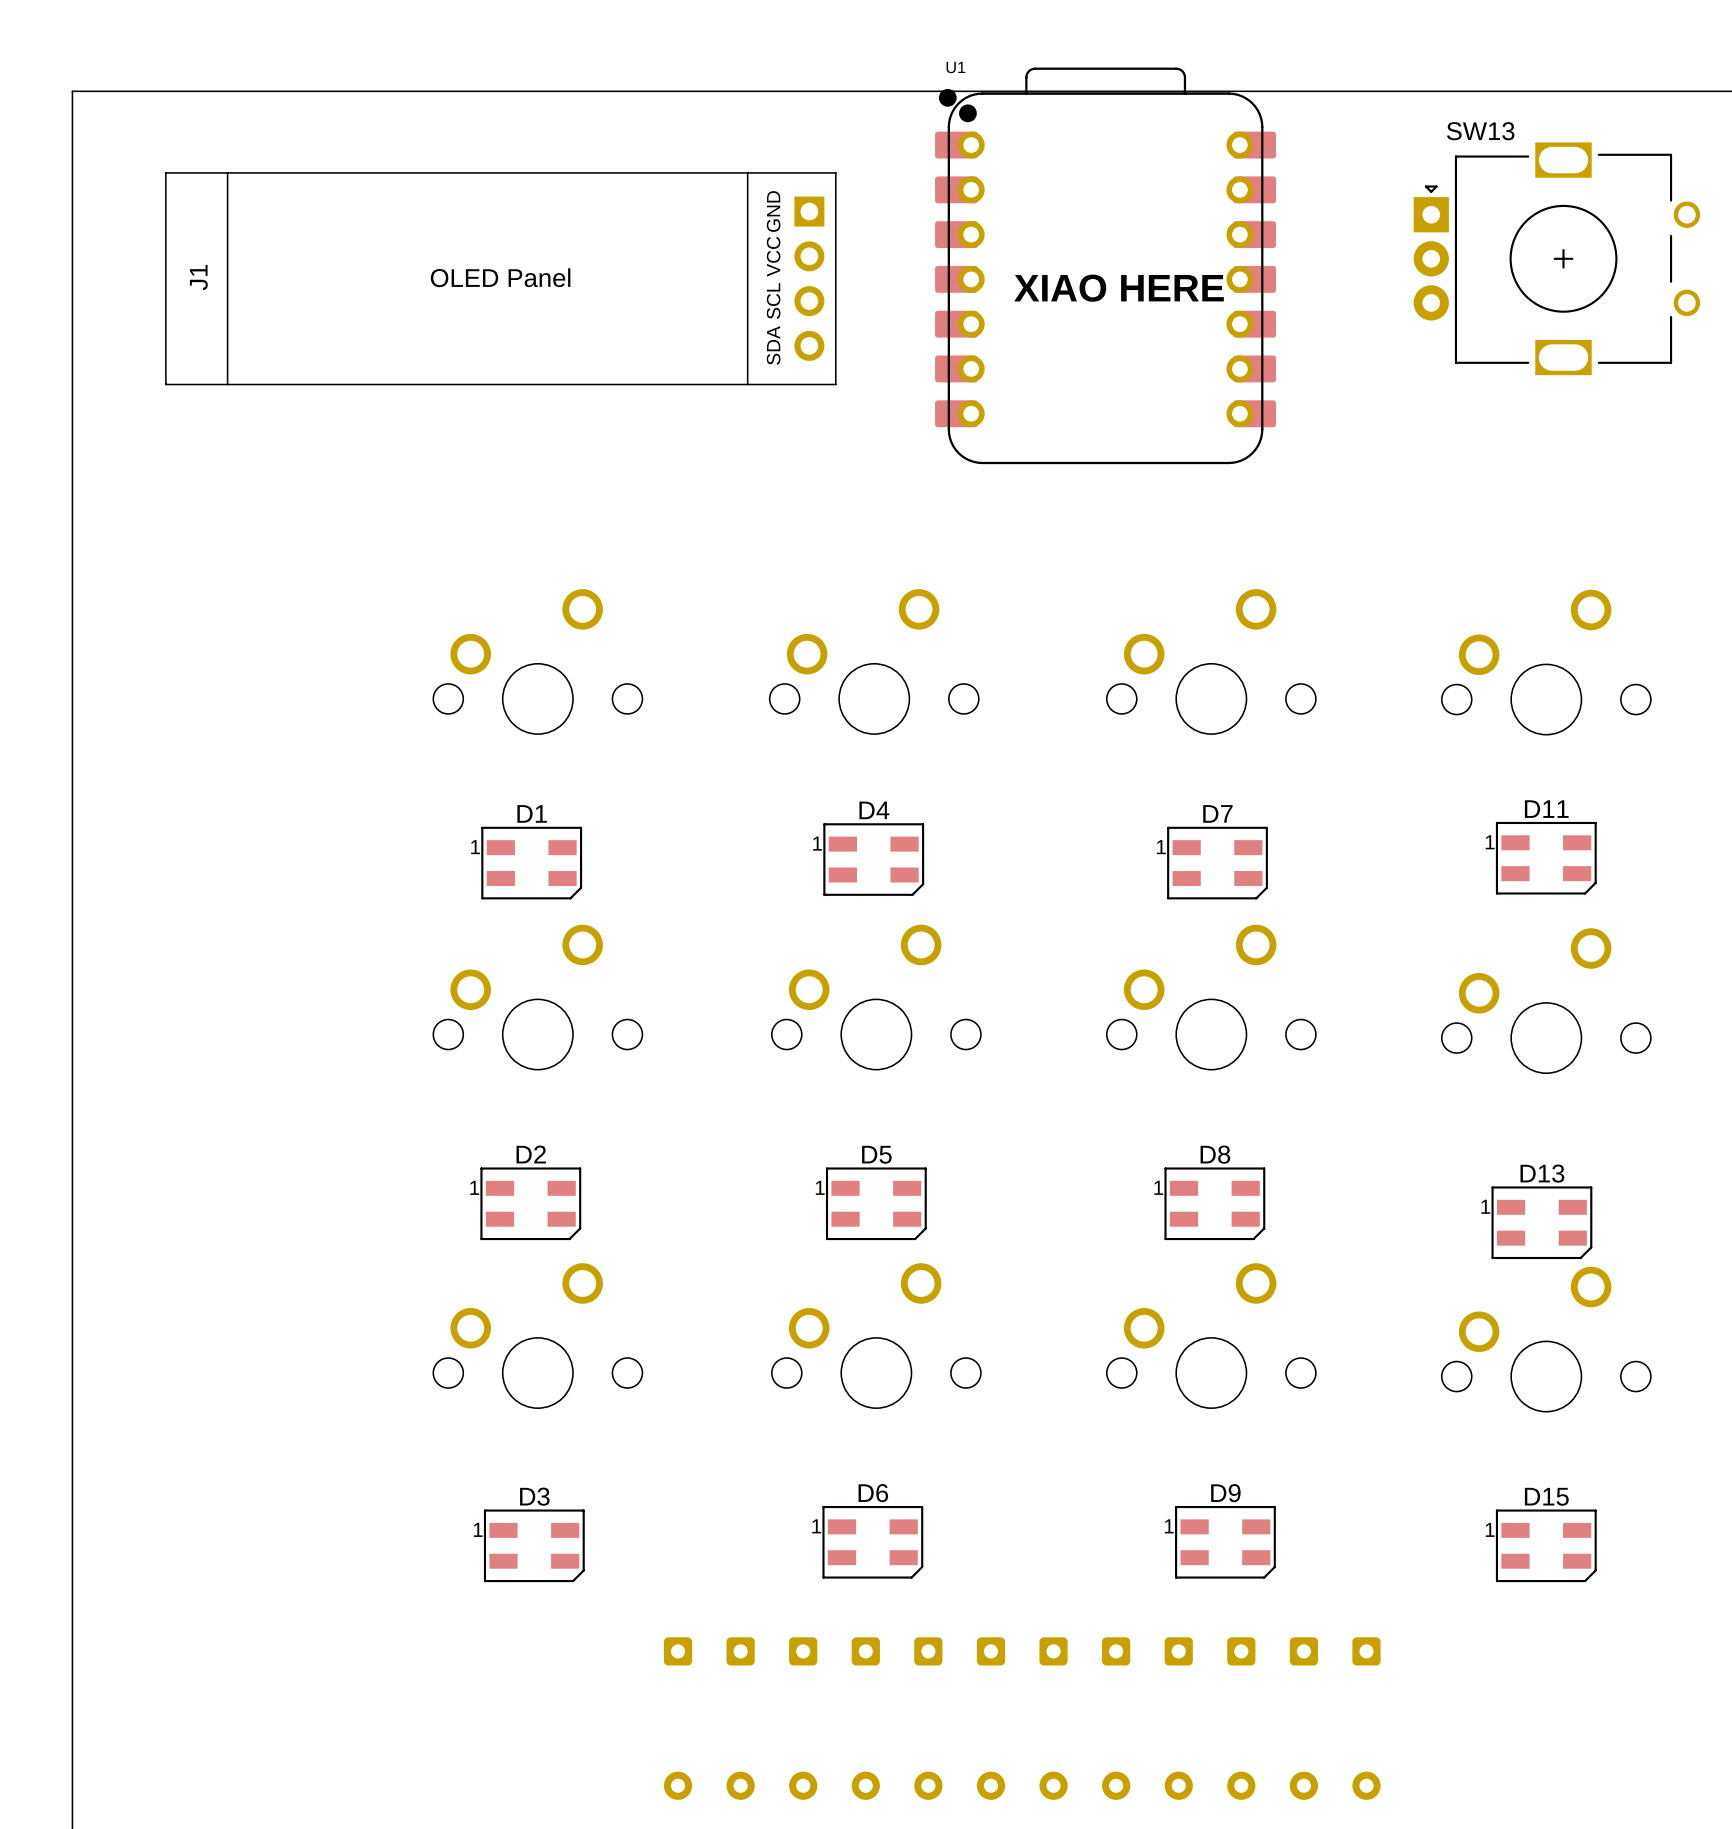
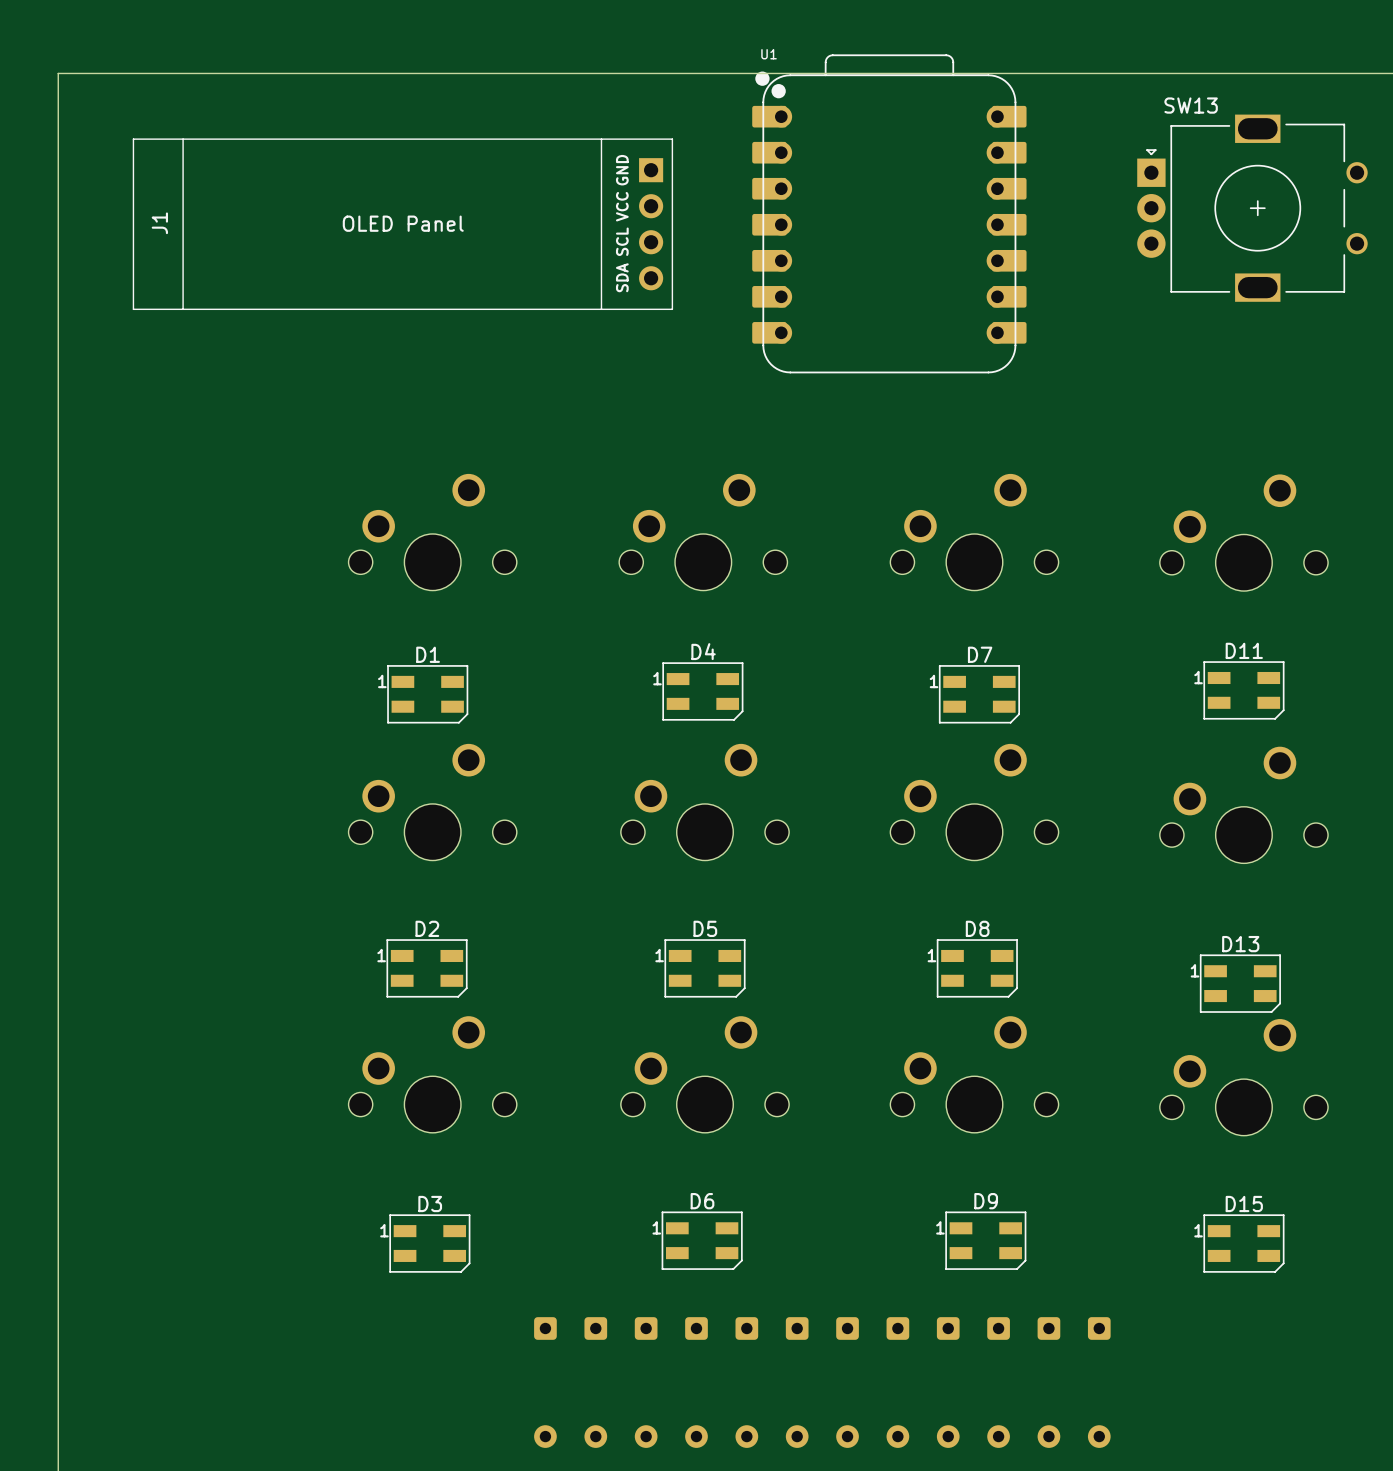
text: XIAO HERE (1119, 288) -> none

